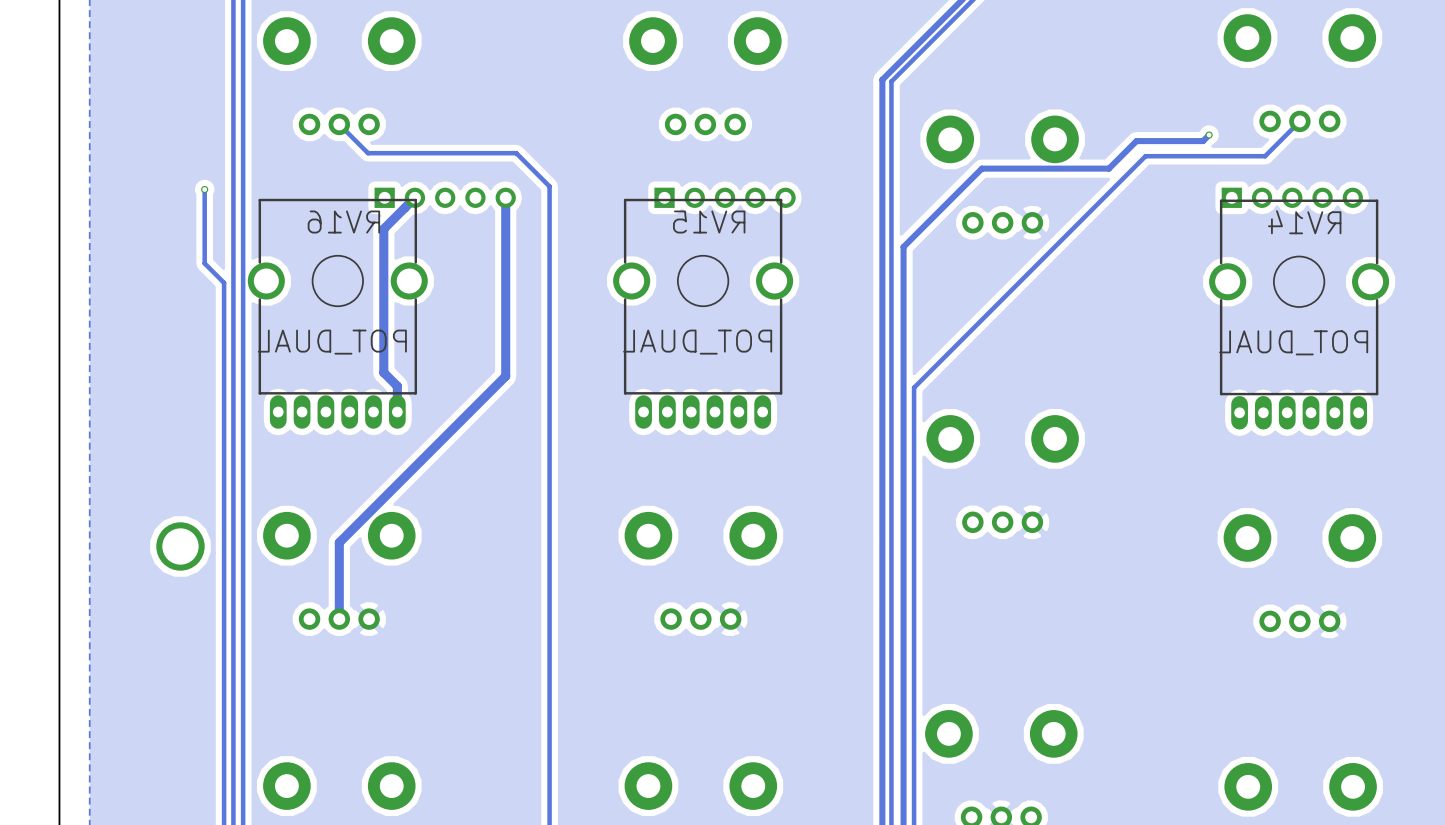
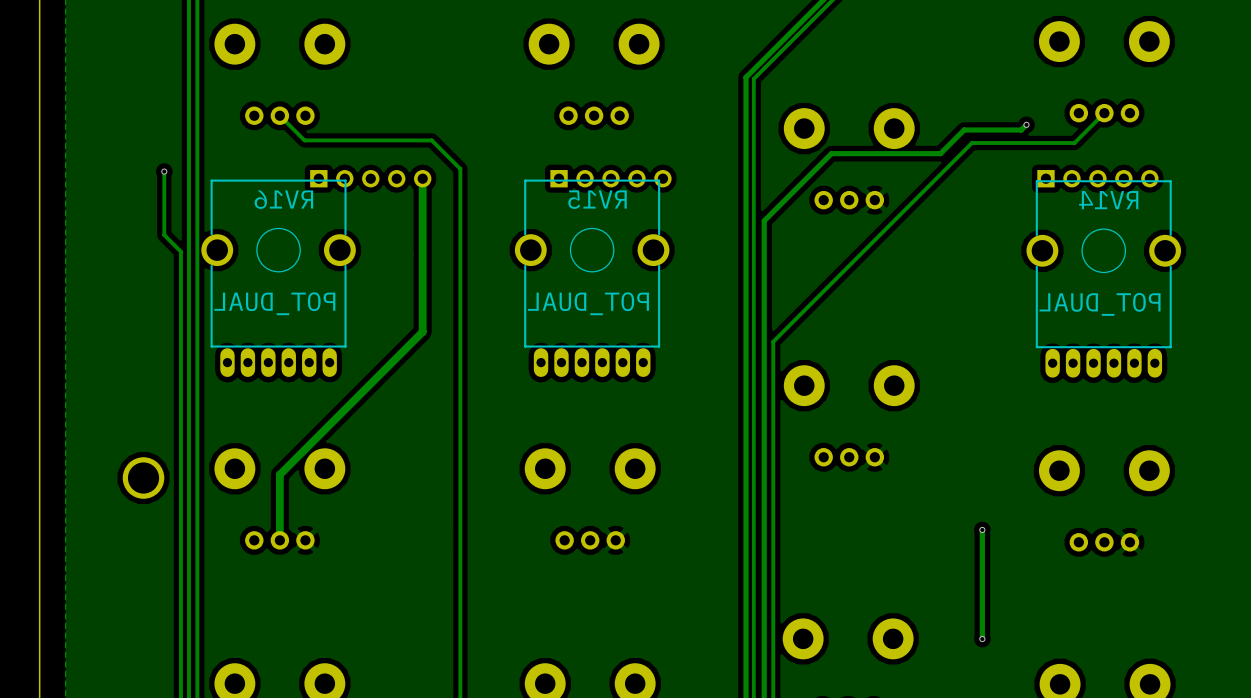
track: (414, 197) (383, 228) (383, 372) (397, 386) (397, 412) -> none
track: none -> (982, 529) (982, 639)
via: none -> (982, 529)
via: none -> (982, 639)

